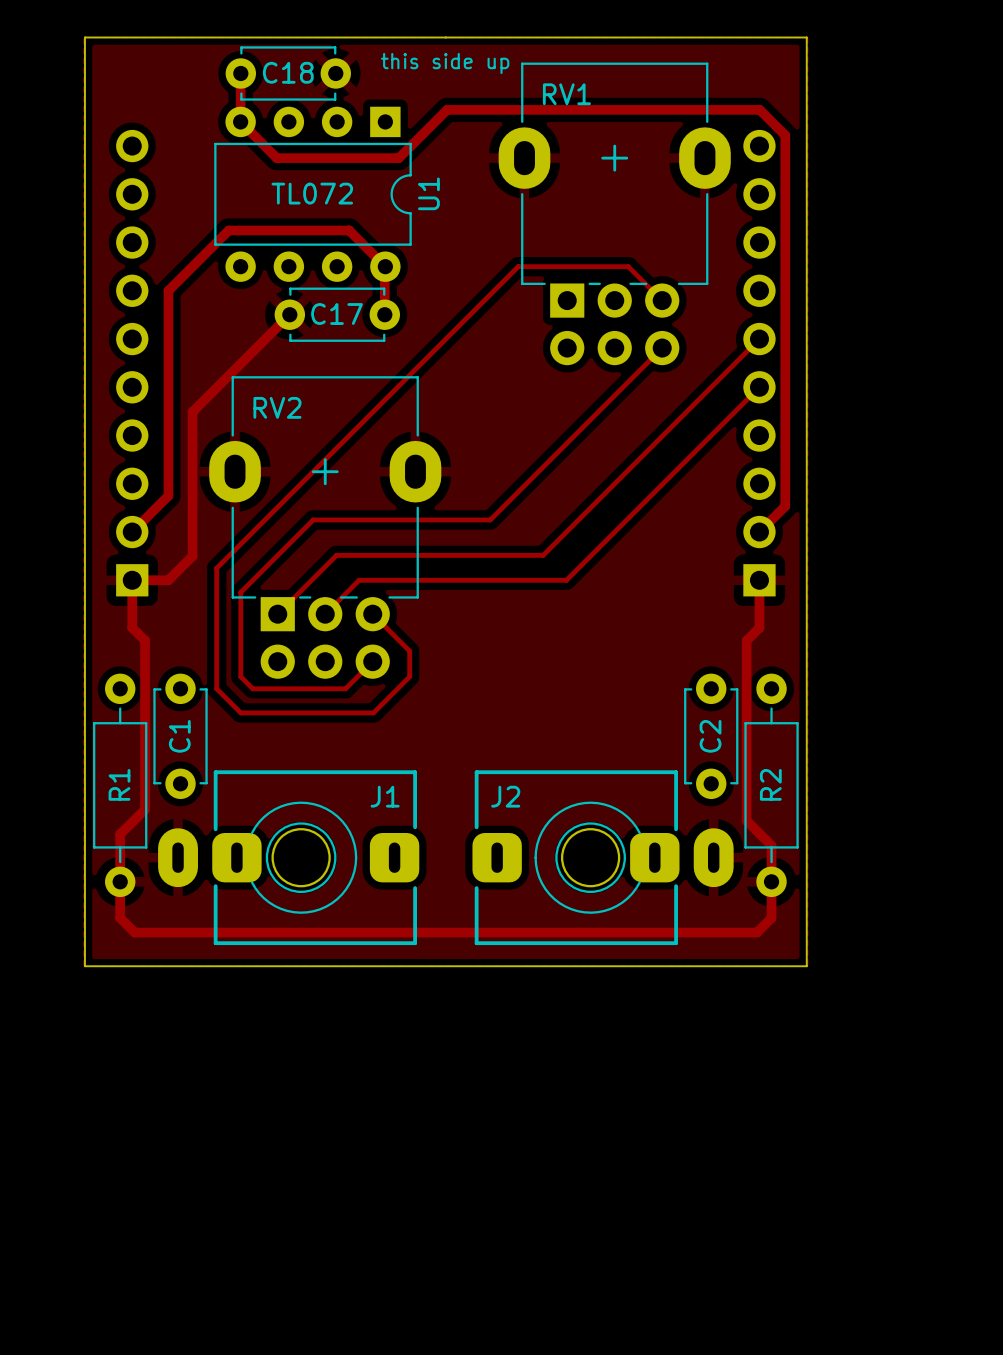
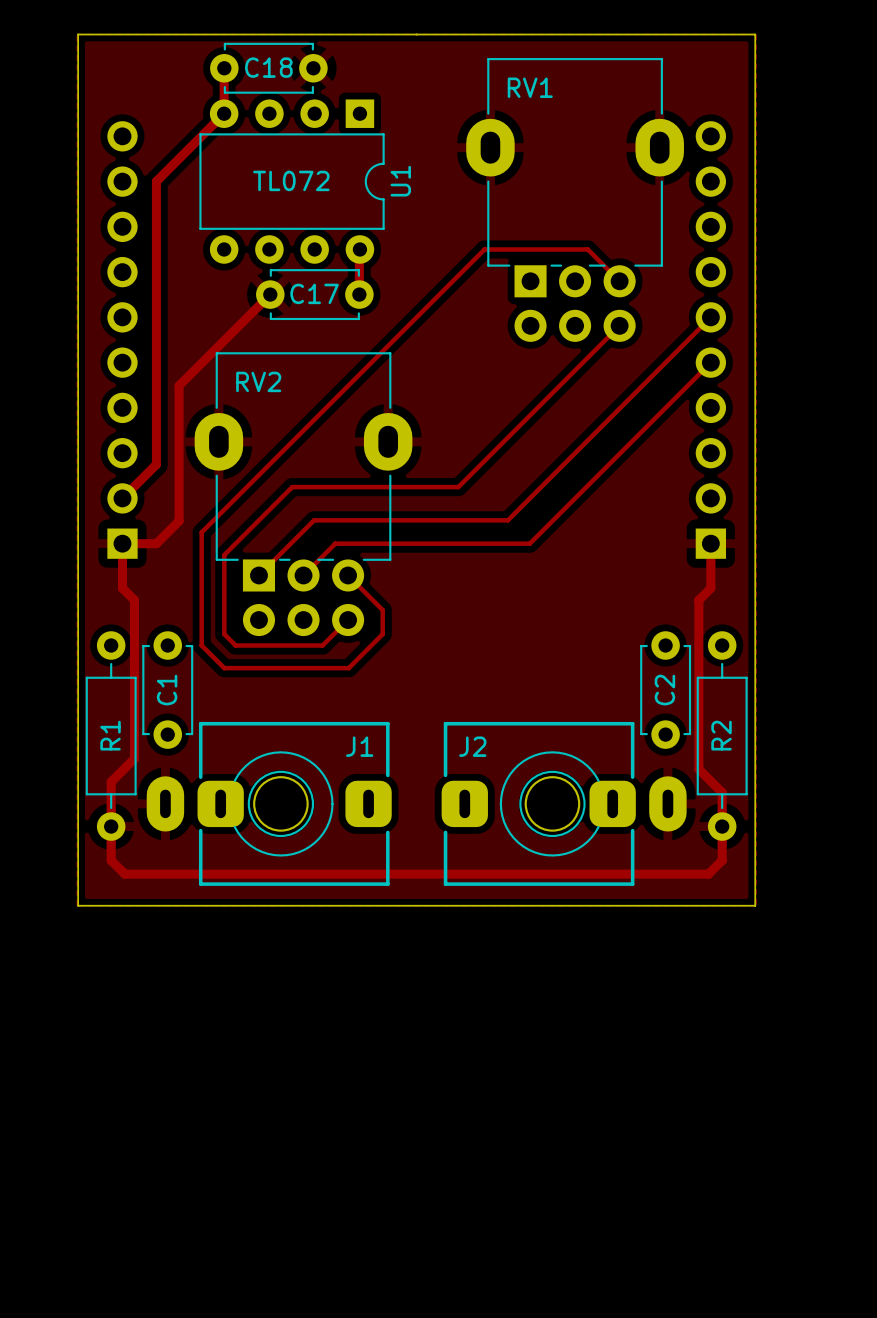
text: this side up (445, 63) -> none
track: (240, 121) (276, 158) (398, 158) (447, 109) (759, 109) (785, 135) (785, 506) (759, 532) -> none
line: (614, 146) (614, 170) -> none
line: (602, 158) (626, 158) -> none
track: (385, 266) (349, 230) (228, 230) (168, 290) -> (224, 113) (156, 181) (156, 272)
line: (325, 459) (325, 483) -> none
line: (313, 471) (337, 471) -> none

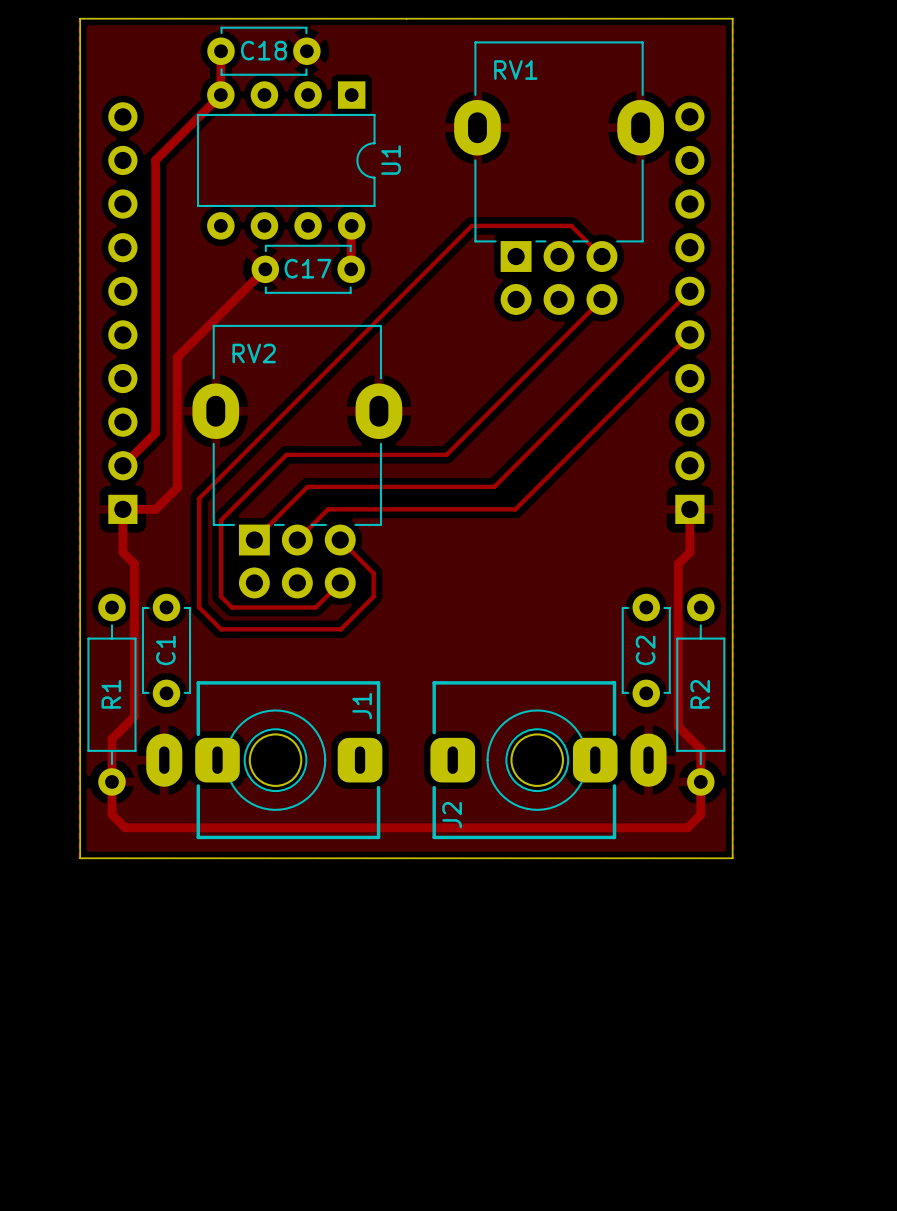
U1 value: TL072 (291, 180) -> none
J1 name rotation: 0° (359, 746) -> 90° counterclockwise (362, 706)
J2 name rotation: 0° (472, 746) -> 90° counterclockwise (452, 815)
J2 name position: J2 (472, 746) -> J2 (452, 815)

